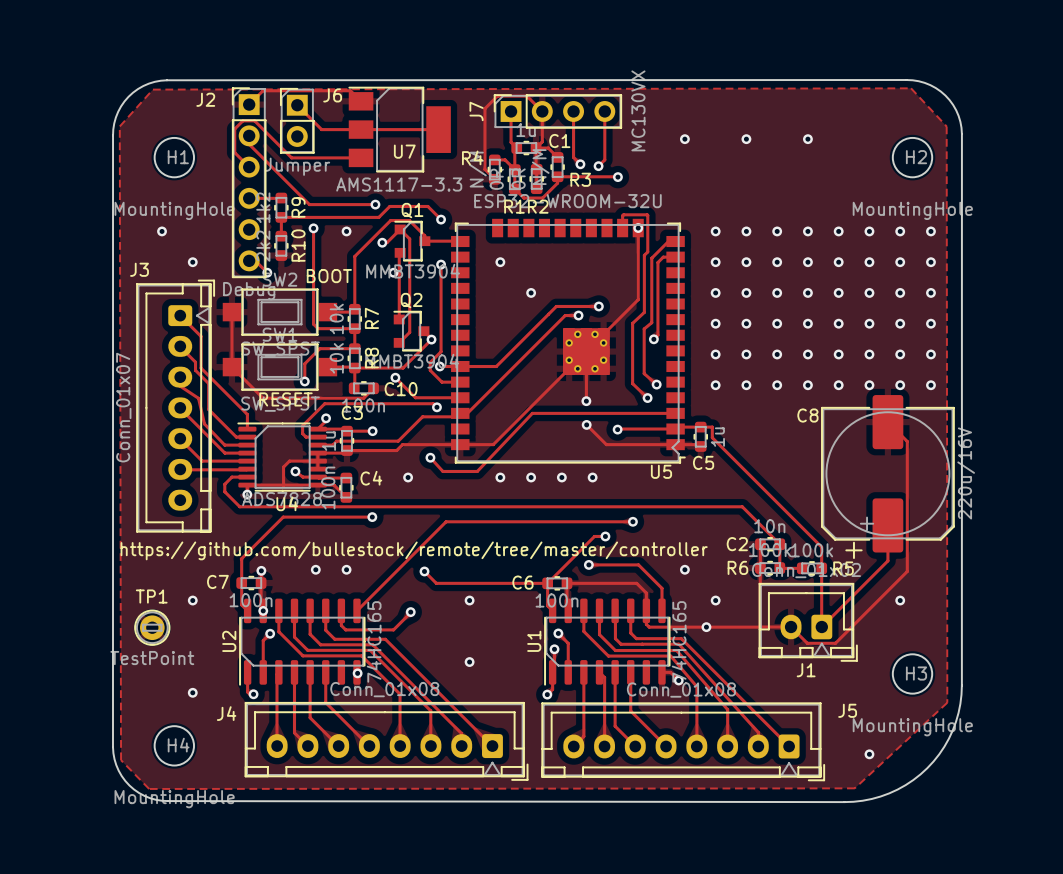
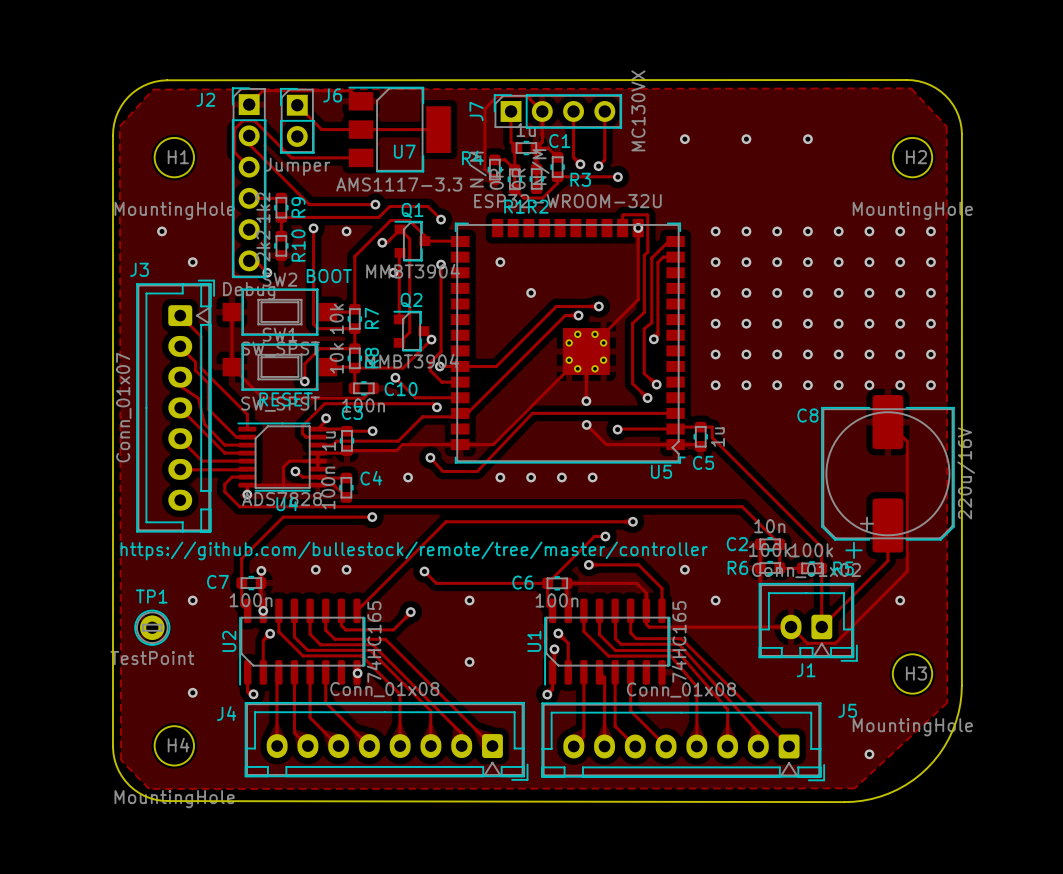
via: (706, 627) -> none
track: (661, 672) (670, 672) (678, 680) -> none
via: (678, 680) -> none

